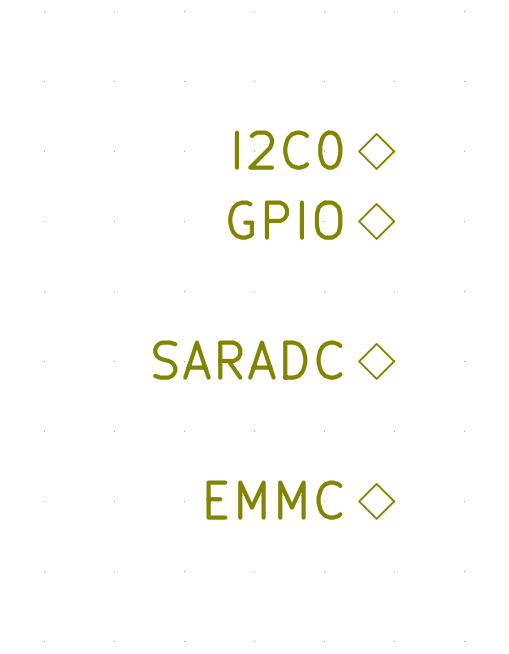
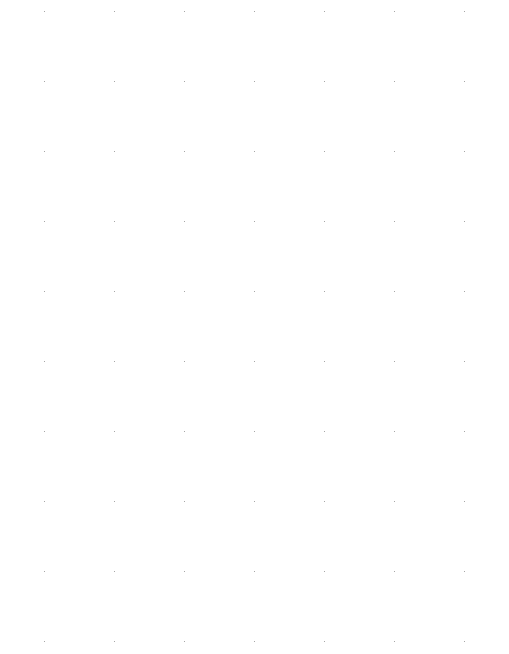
hierarchical label: I2C0 (288, 150) -> none
hierarchical label: GPIO (285, 220) -> none
hierarchical label: SARADC (247, 360) -> none
hierarchical label: EMMC (274, 500) -> none

